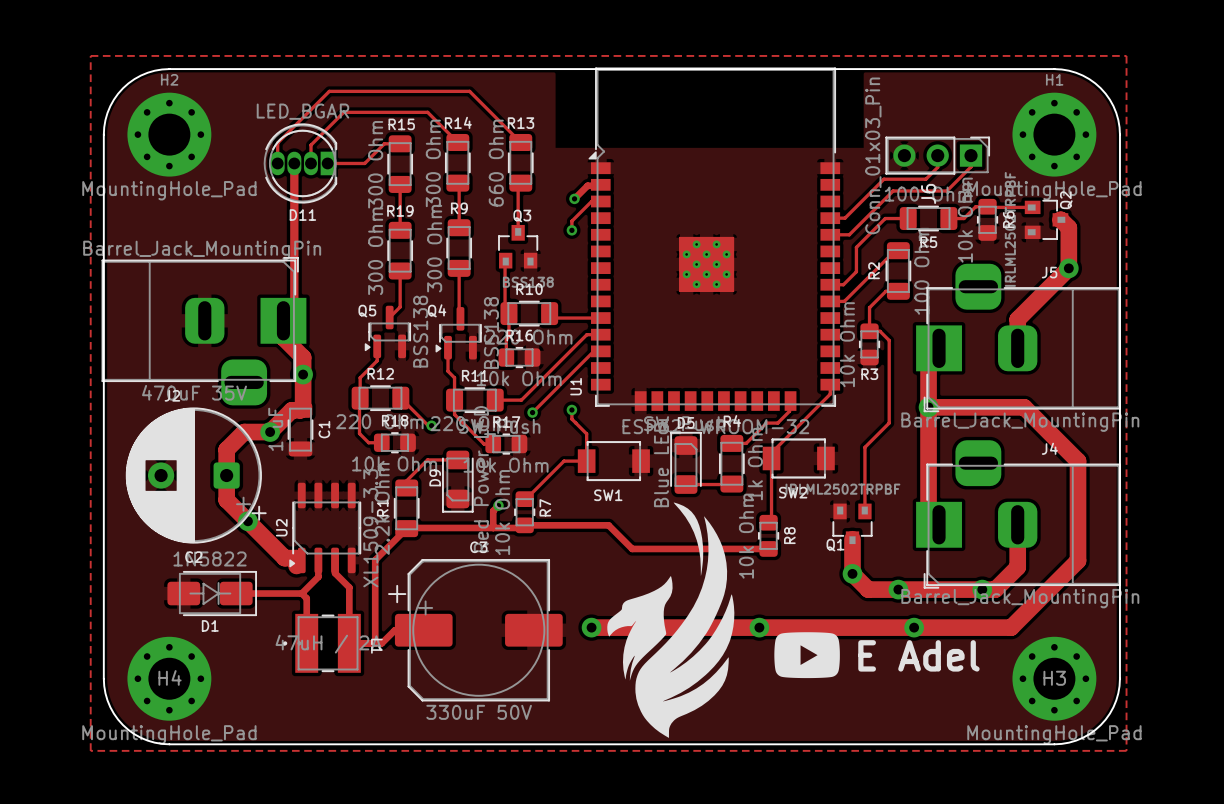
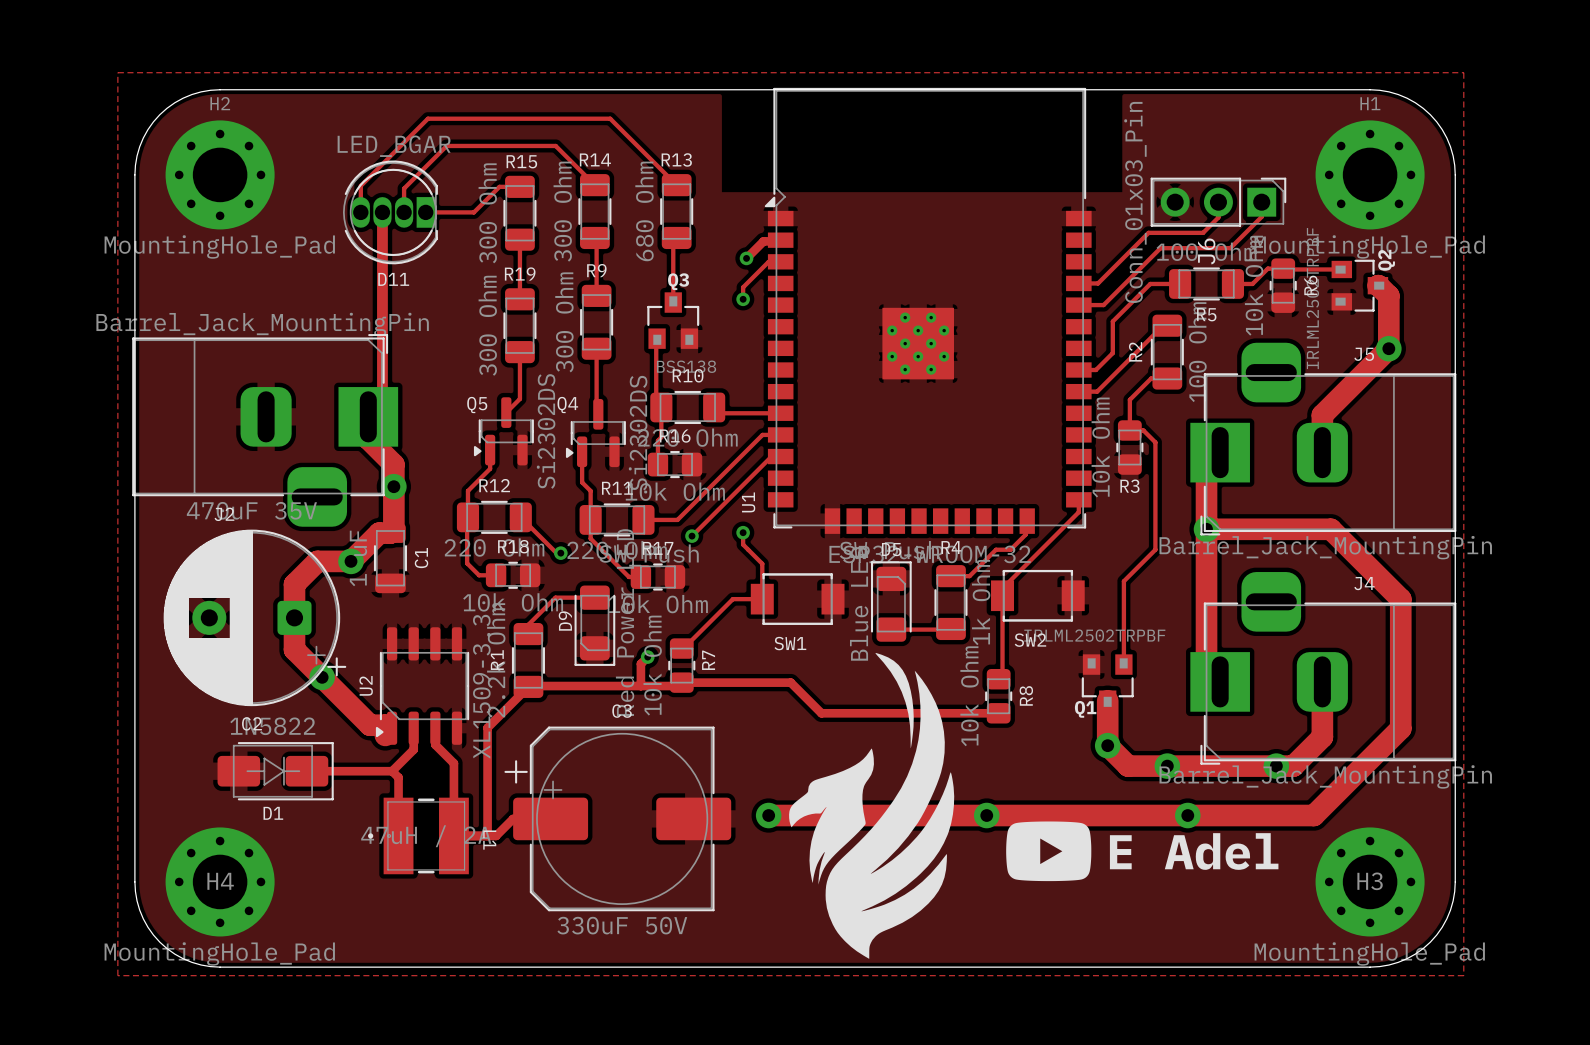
R13 value: 660 Ohm (496, 163) -> 680 Ohm (644, 211)
Q5 value: BSS138 (420, 331) -> Si2302DS (546, 431)
Q4 value: BSS138 (491, 332) -> Si2302DS (638, 433)

